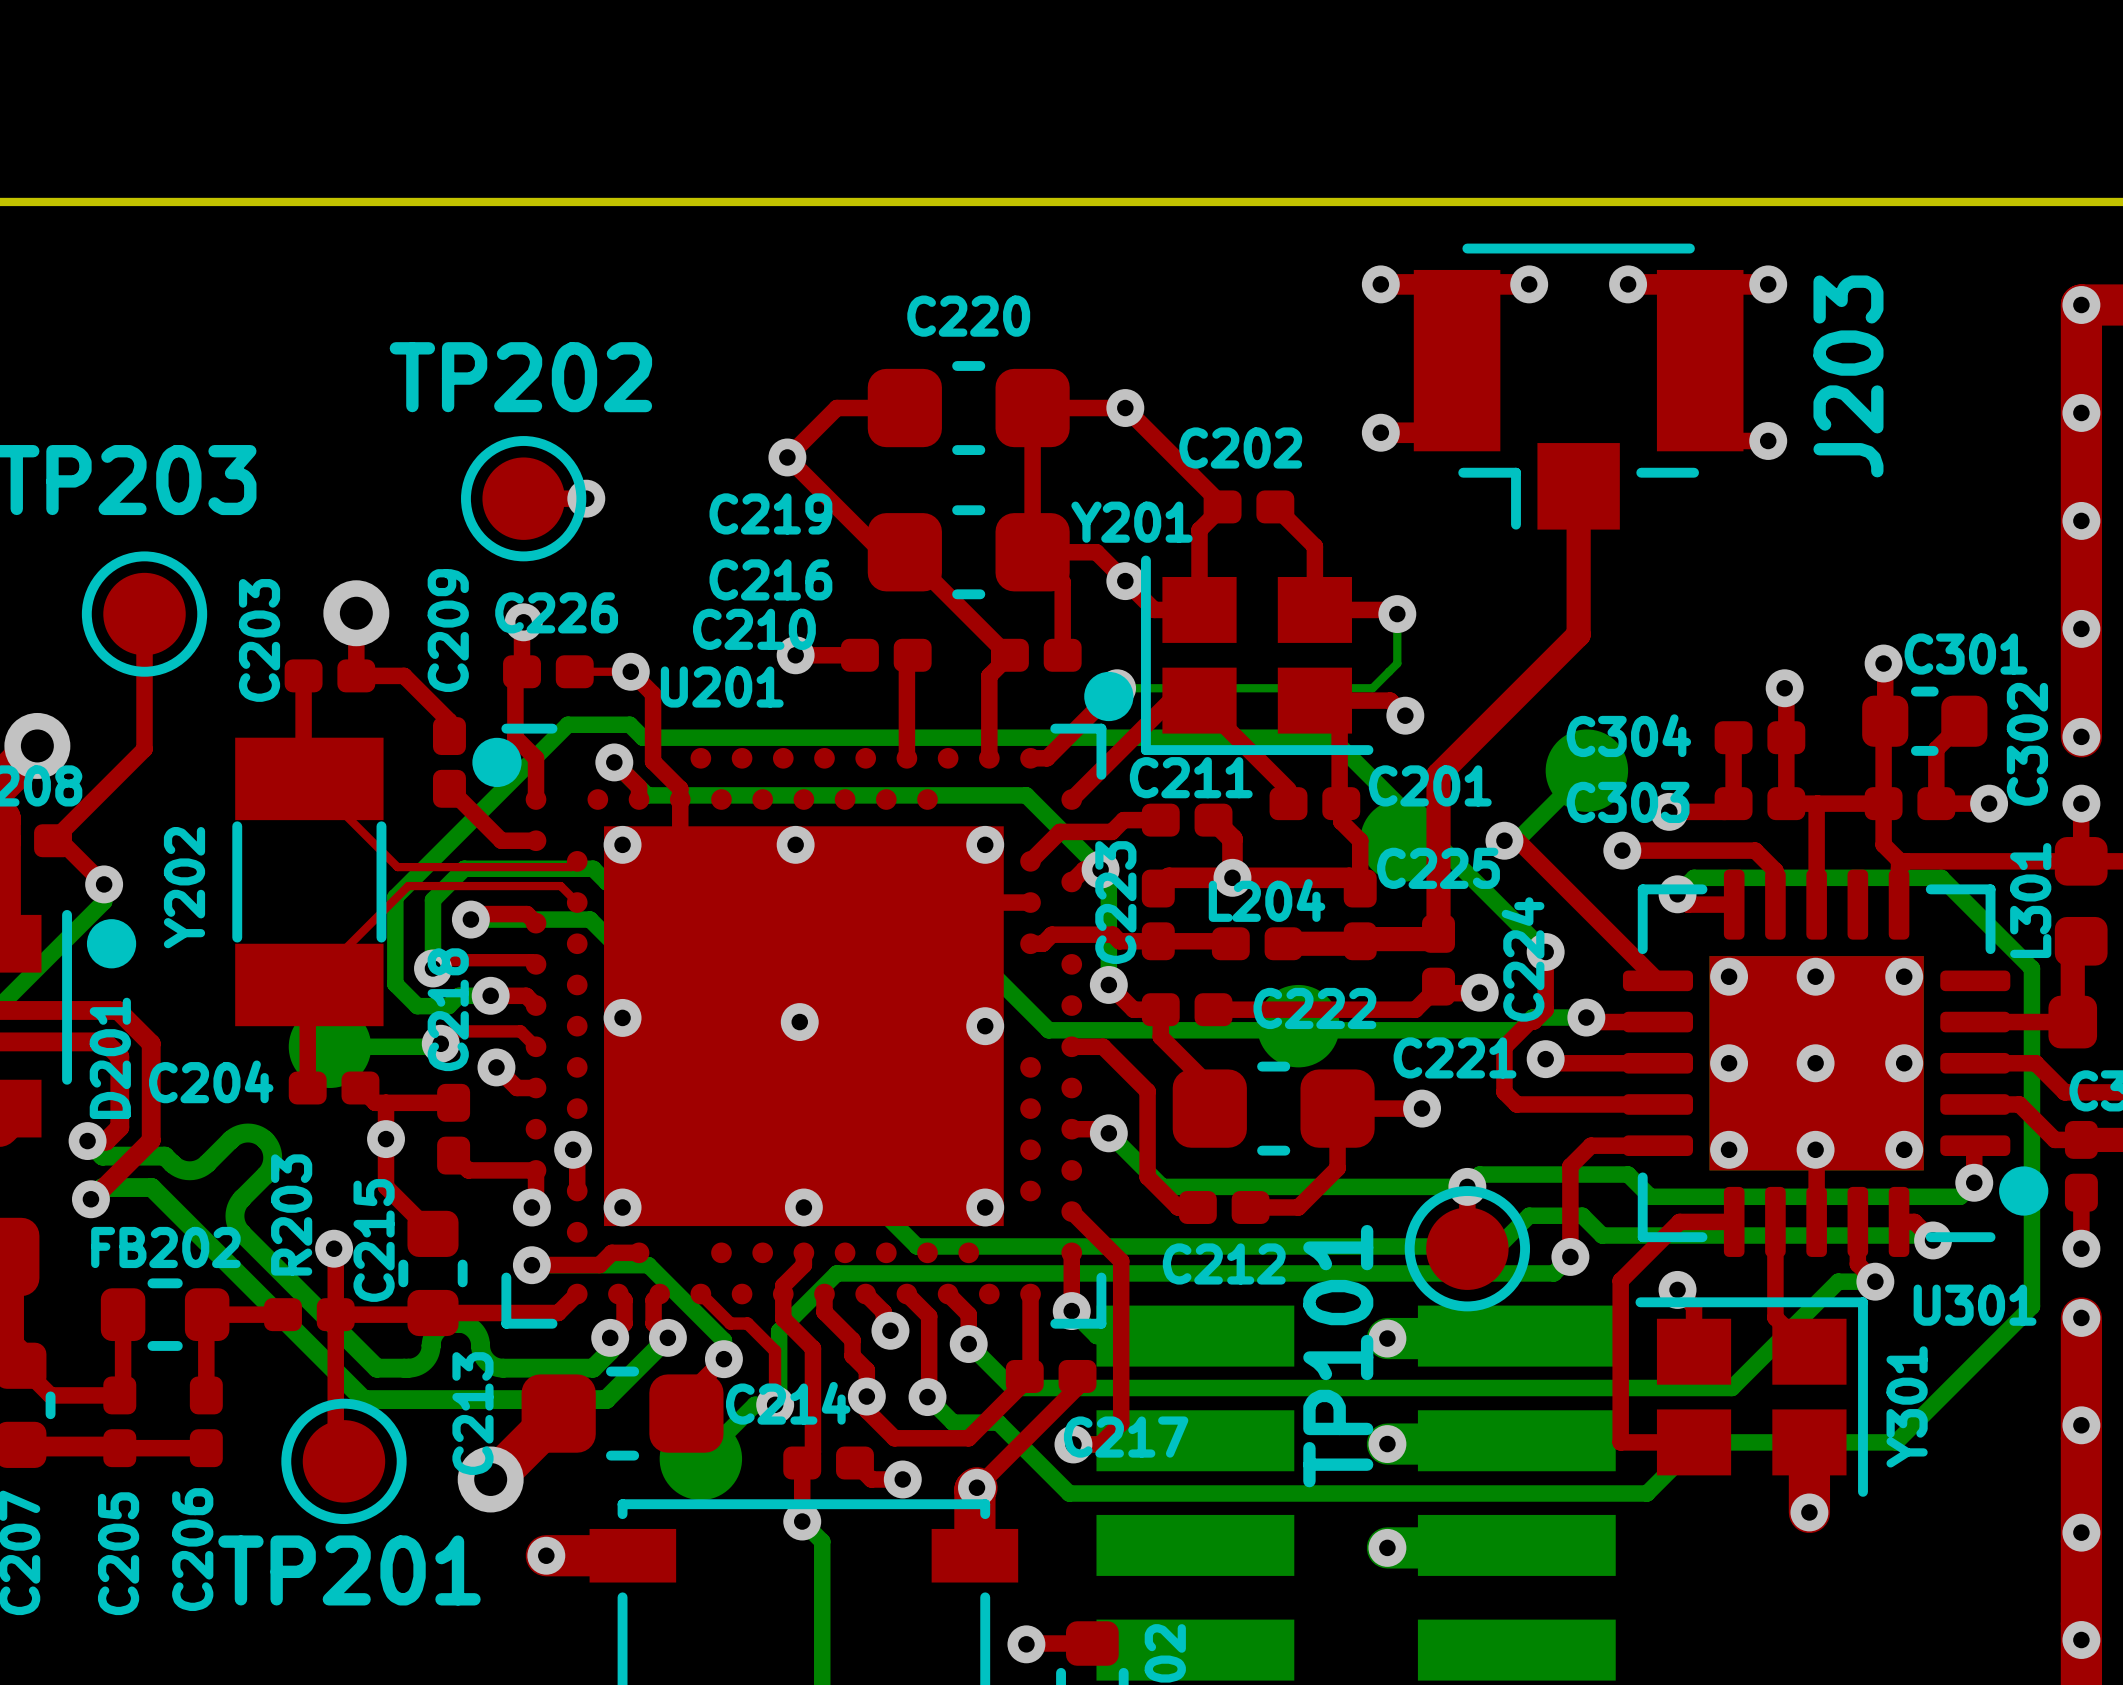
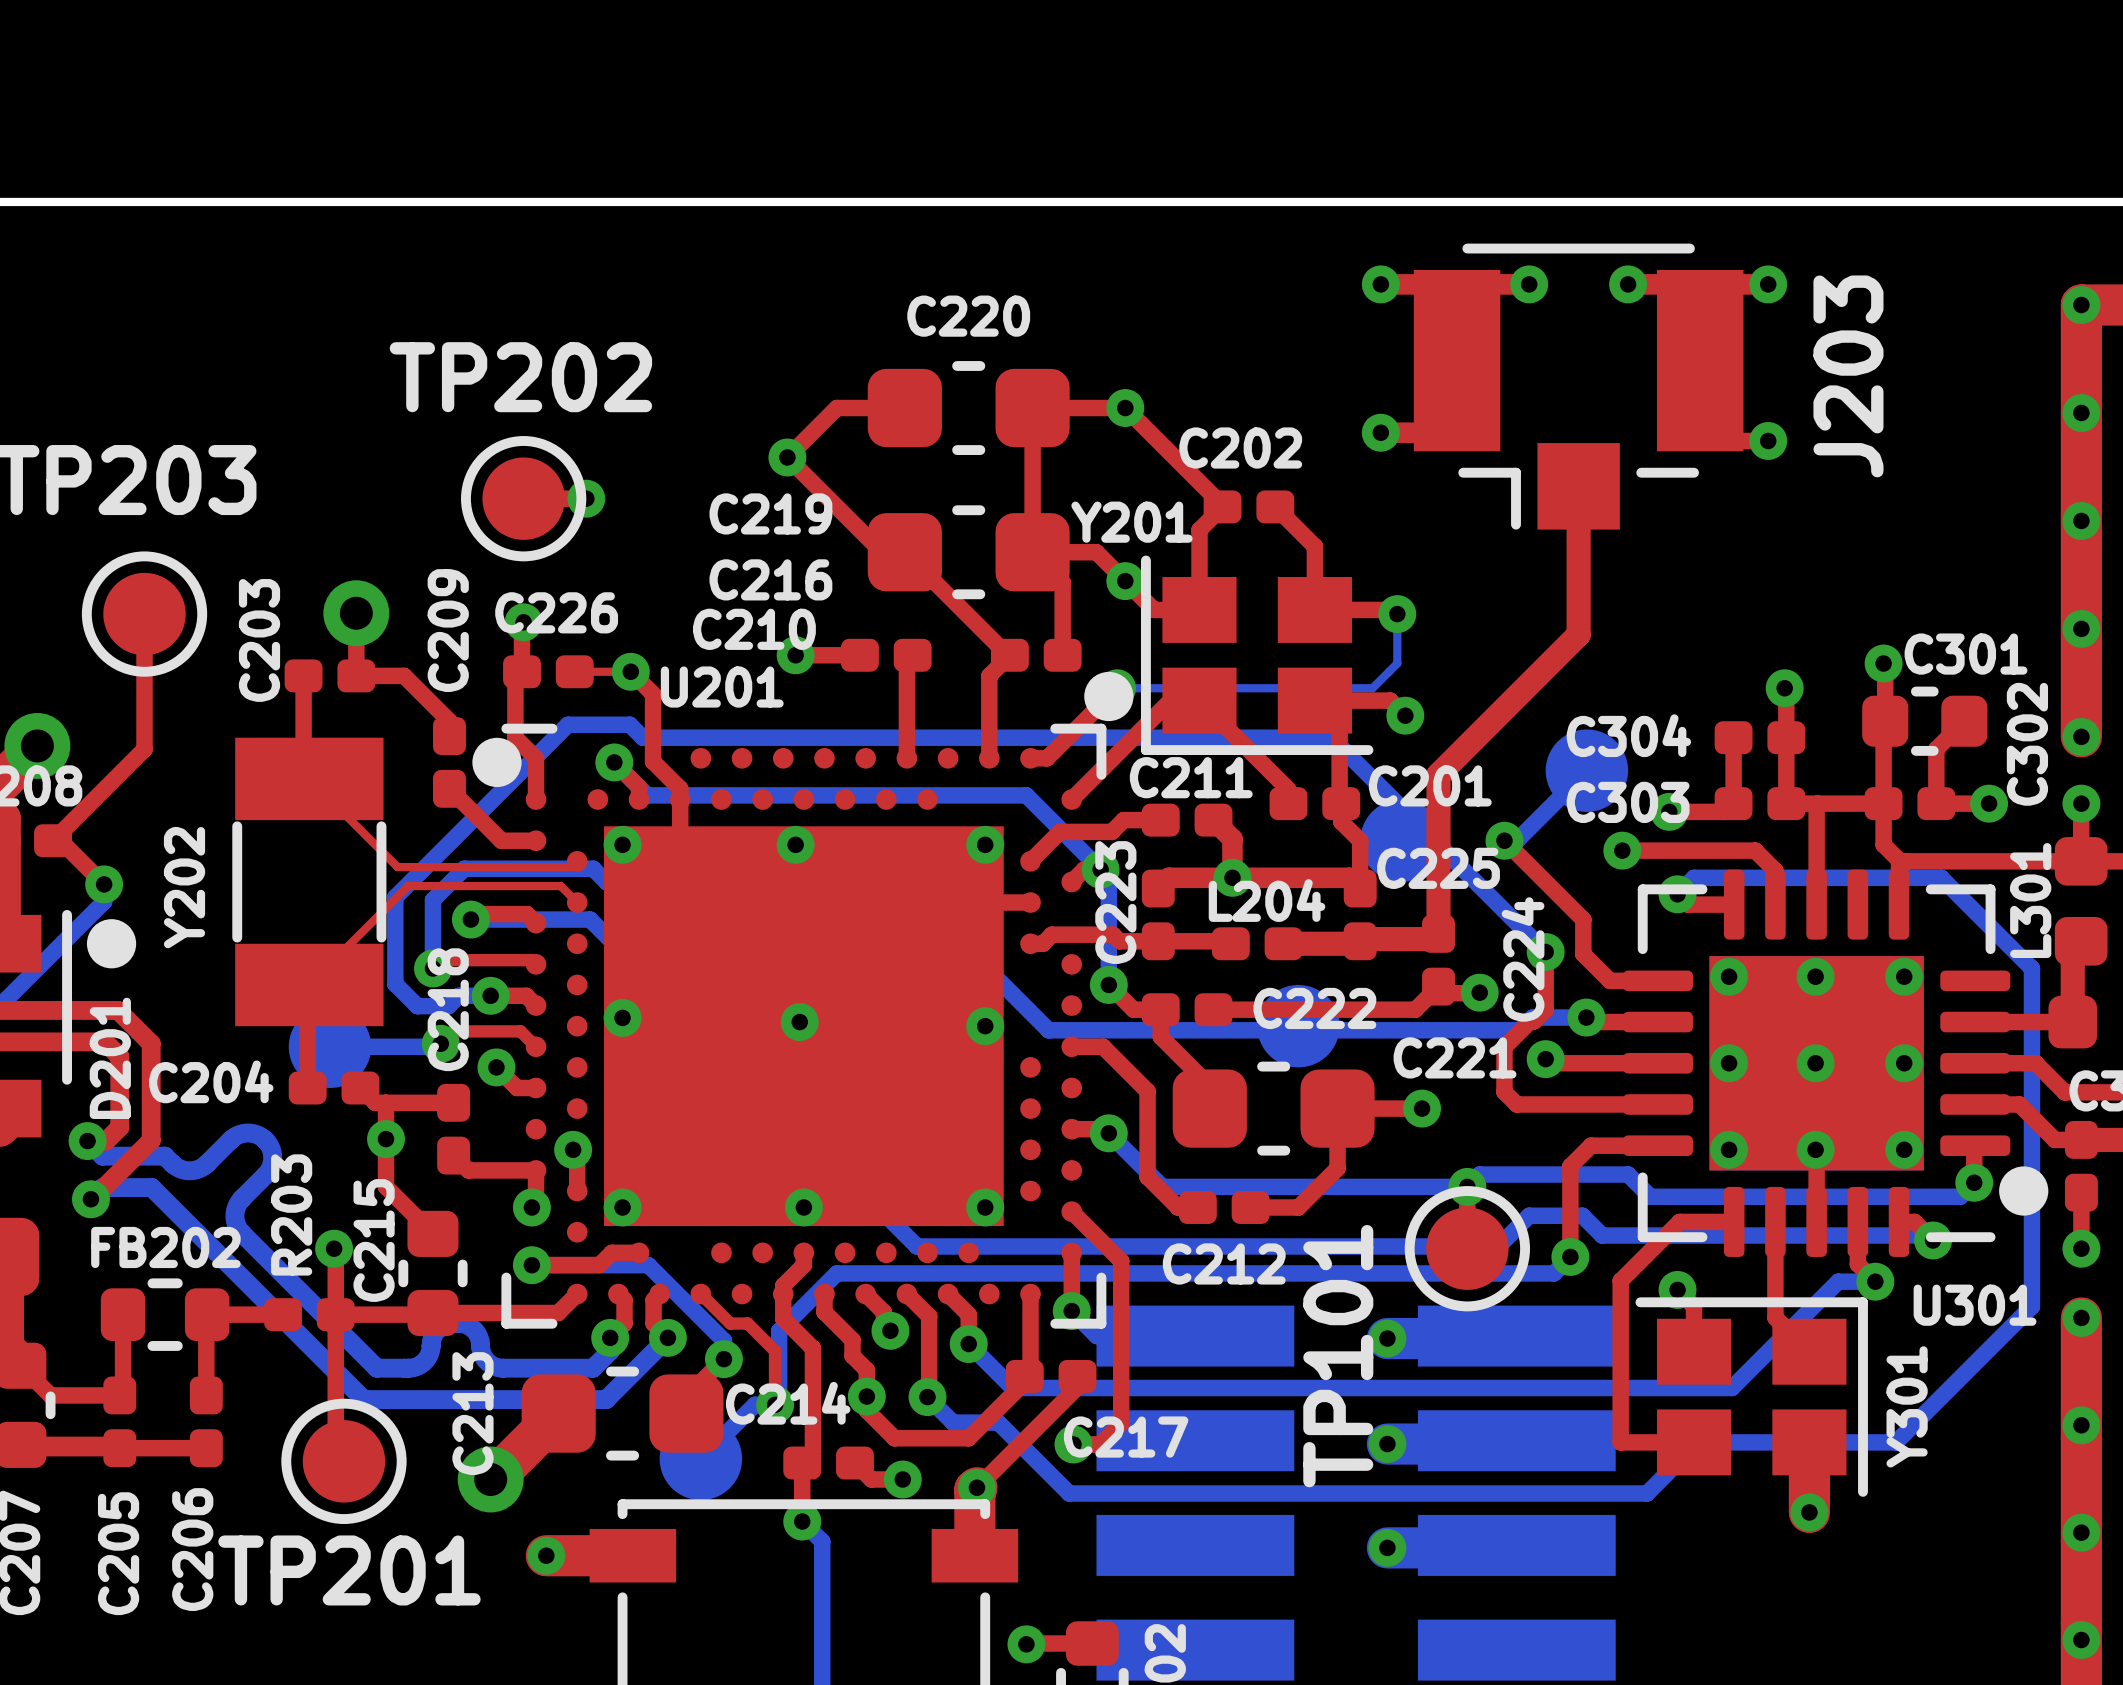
top track: (1504, 840) (1517, 840) (1657, 980) -> (1504, 840) (1583, 919) (1583, 954) (1609, 980) (1657, 980)

